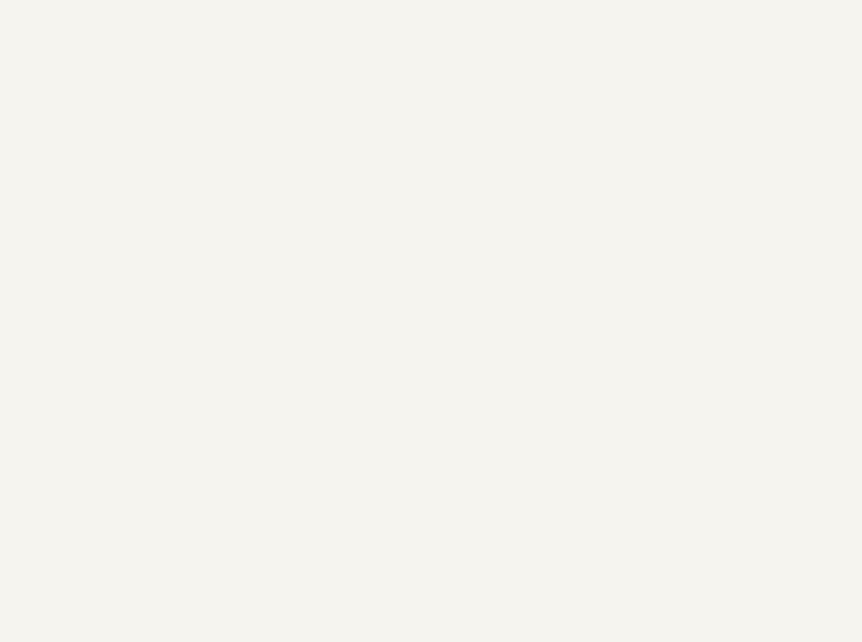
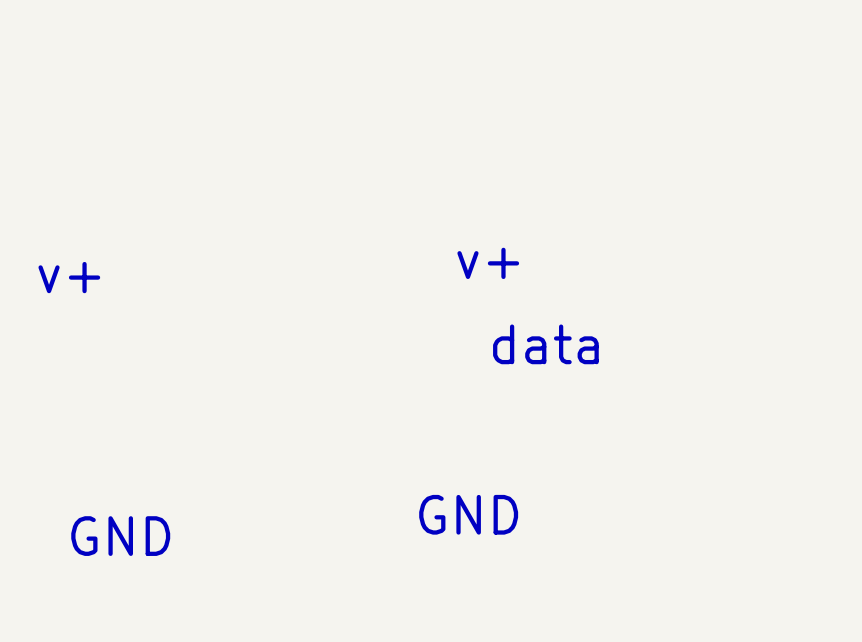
text: none -> v+ (488, 263)
text: none -> v+ (69, 277)
text: none -> data (545, 344)
text: none -> GND (468, 514)
text: none -> GND (120, 536)

